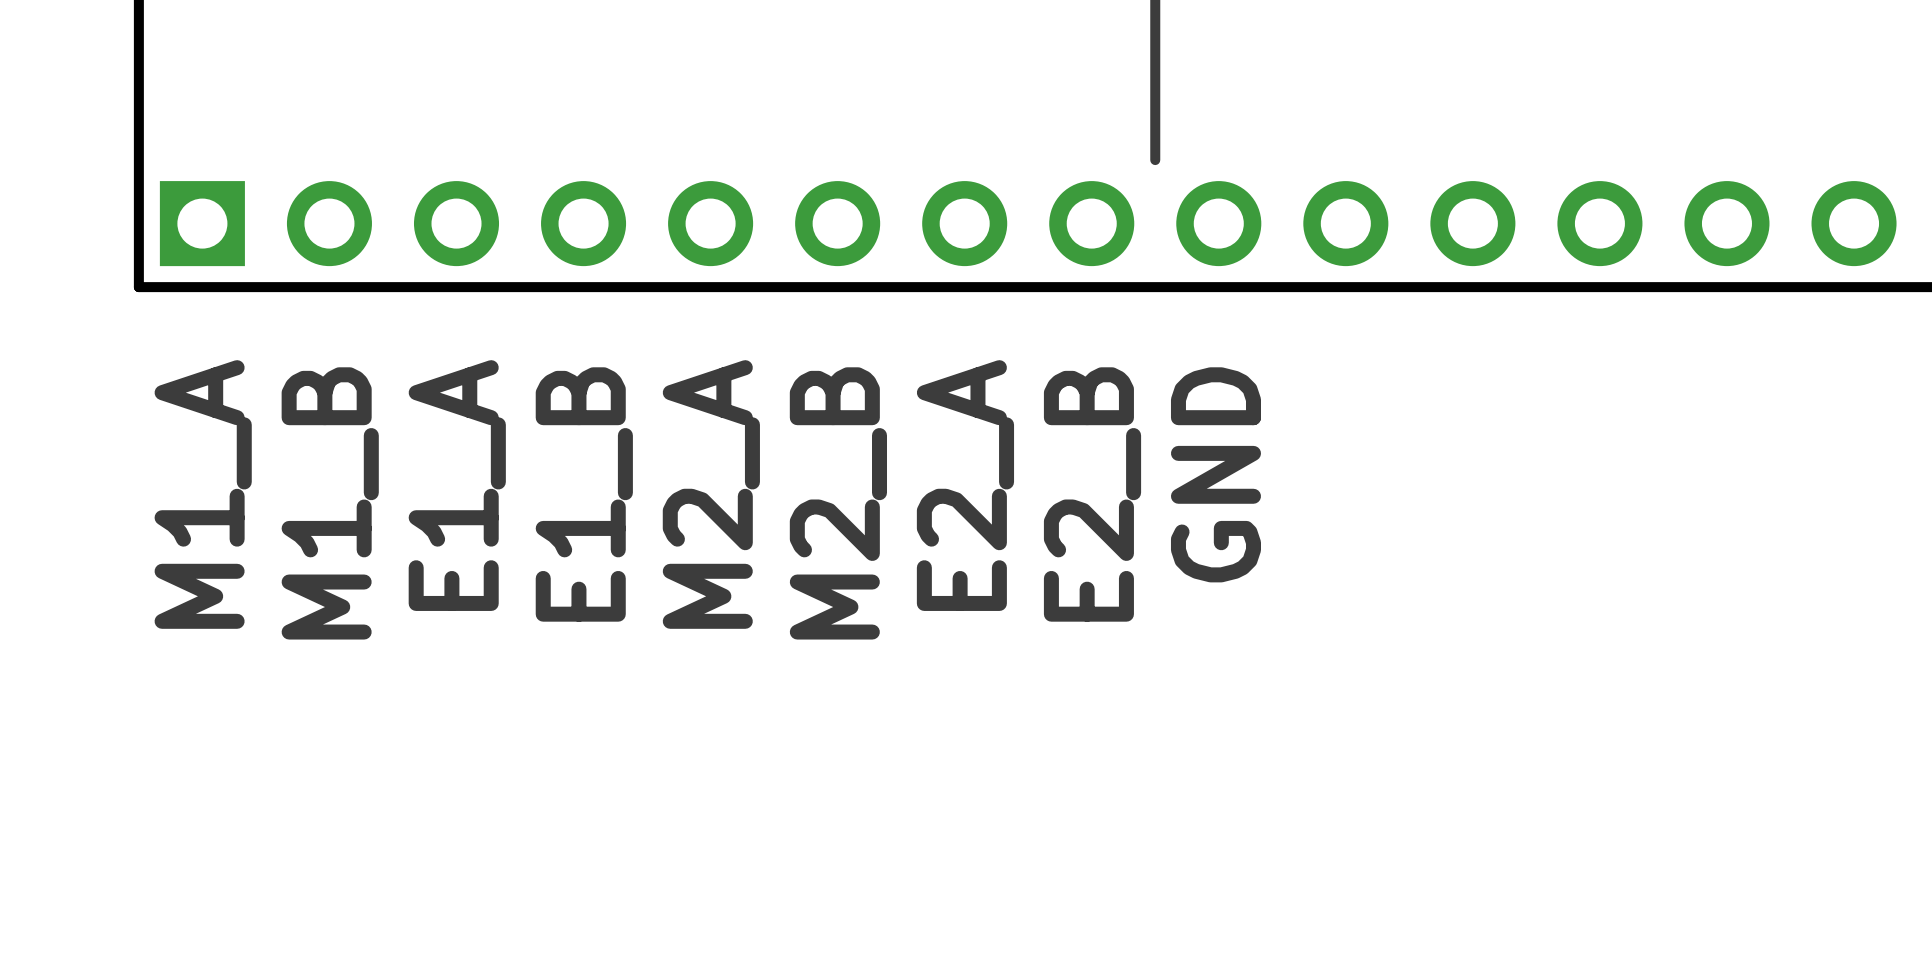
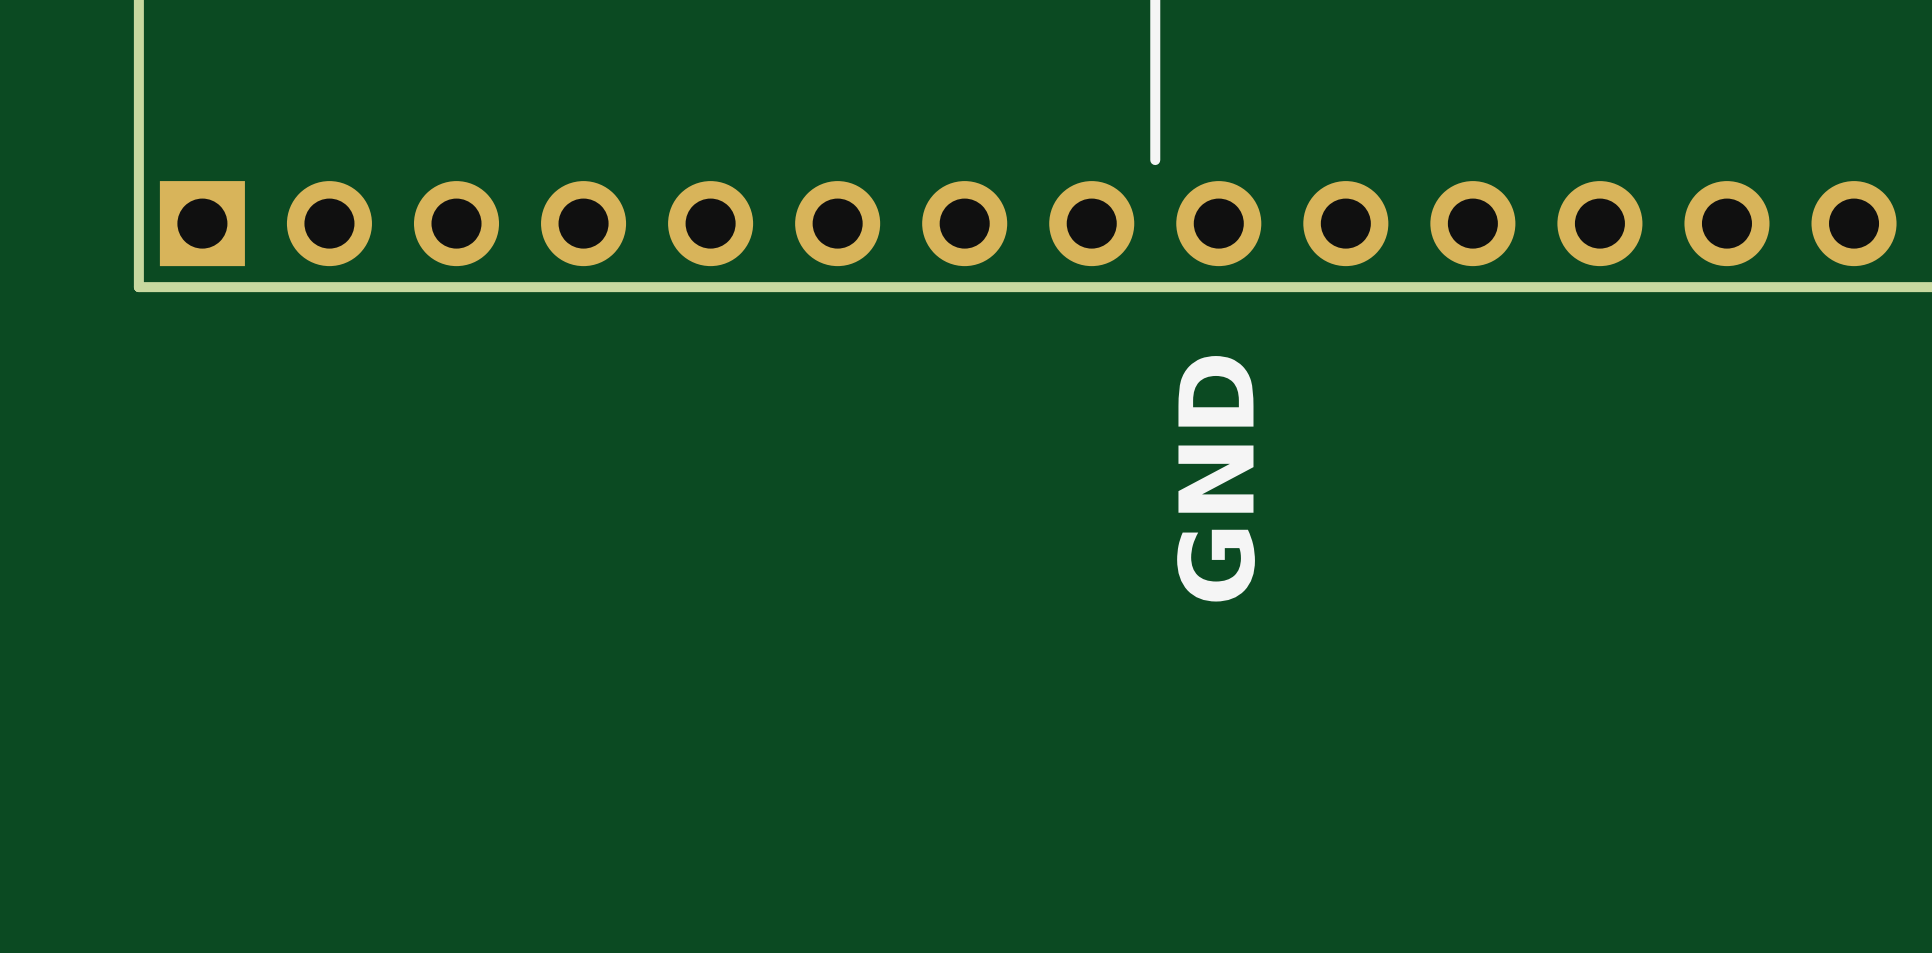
text: E1_A (457, 485) -> none
text: E2_A (965, 485) -> none
text: M1_A (203, 494) -> none
text: E1_B (584, 494) -> none
text: M2_A (711, 494) -> none
text: E2_B (1092, 494) -> none
text: M1_B (330, 503) -> none
text: M2_B (838, 503) -> none

